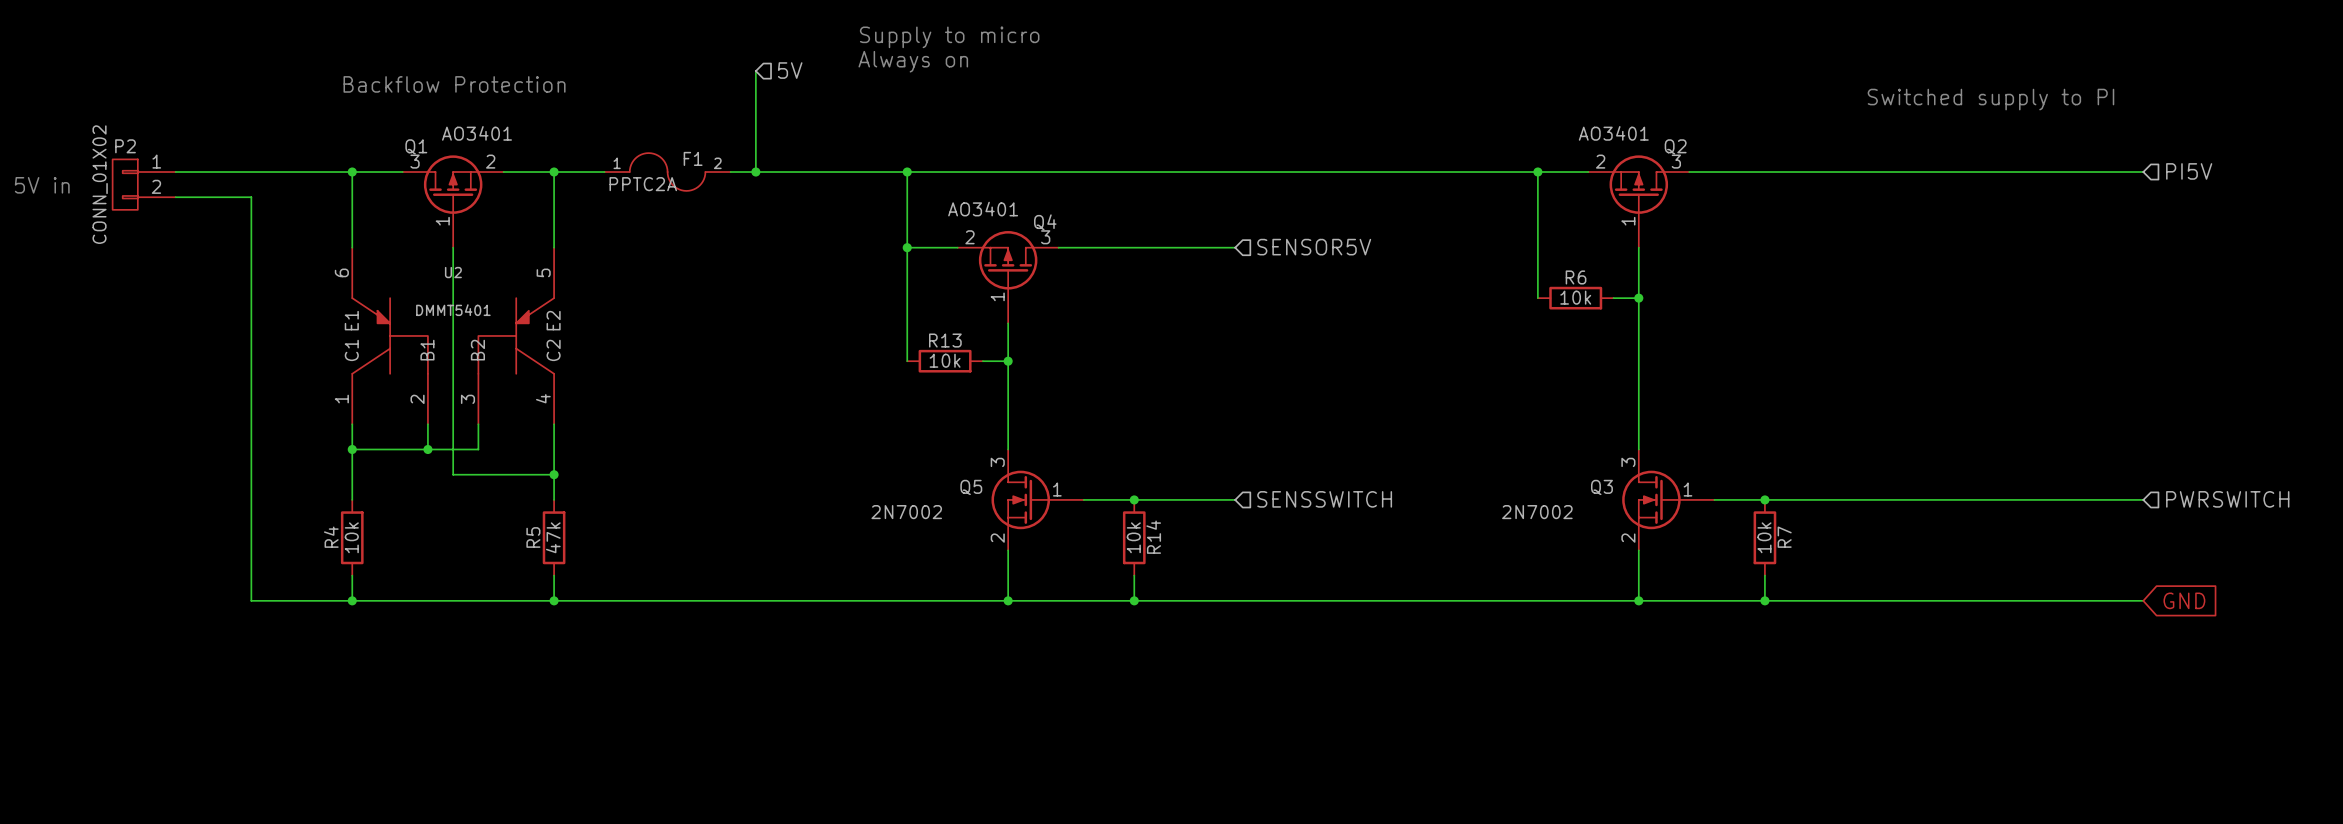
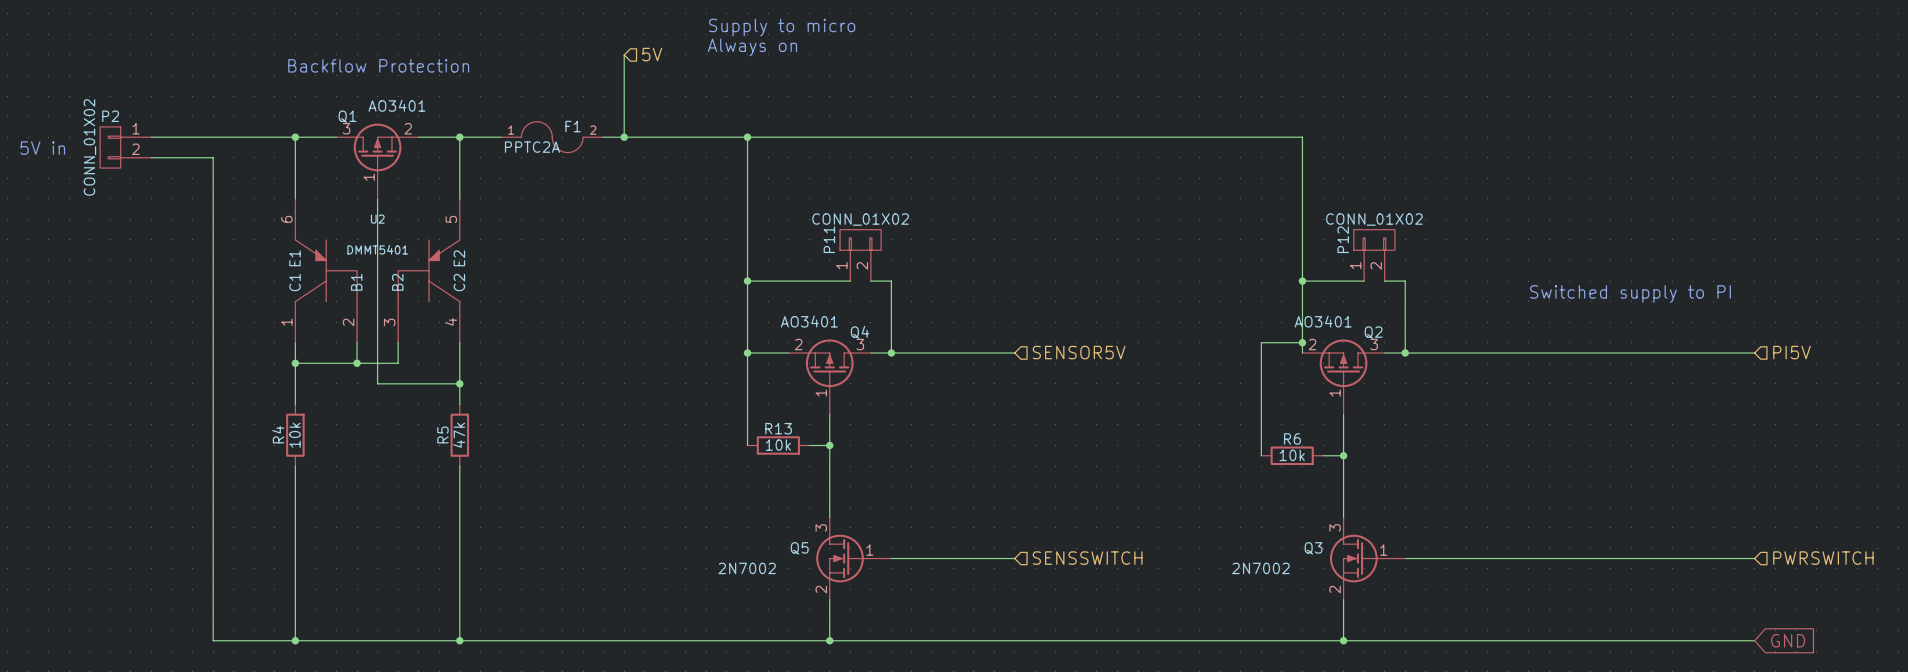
text: Switched supply to PI (1990, 99) -> none
hierarchical label: PI5V (2189, 171) -> none
wire: (1537, 172) (1537, 298) -> none
junction: (1537, 172) -> none
wire: none -> (1302, 137) (1302, 353)
wire: (1689, 172) (2143, 172) -> none
Q2 position: (1638, 201) -> (1343, 377)
wire: (907, 247) (957, 247) -> (747, 353) (788, 353)
junction: (907, 247) -> none
wire: (1058, 247) (1235, 247) -> (870, 353) (1014, 353)
hierarchical label position: SENSOR5V (1314, 247) -> SENSOR5V (1079, 352)
wire: (1638, 247) (1638, 449) -> none
Q4 position: (1008, 277) -> (829, 377)
R6 position: (1575, 298) -> (1292, 455)
wire: (1613, 298) (1638, 298) -> none
junction: (1638, 298) -> none
P11: none -> CONN_01X02 (860, 255)
P12: none -> CONN_01X02 (1374, 255)
wire: (1008, 323) (1008, 449) -> none
wire: none -> (747, 281) (850, 281)
junction: none -> (747, 281)
wire: none -> (870, 281) (891, 281) (891, 353)
wire: none -> (1302, 281) (1364, 281)
junction: none -> (1302, 281)
wire: none -> (1384, 281) (1405, 281) (1405, 353)
wire: none -> (747, 291) (747, 445)
R13 position: (945, 361) -> (778, 445)
wire: (982, 361) (1008, 361) -> none
junction: (1008, 361) -> none
text: none -> Switched supply to PI (1630, 293)
wire: none -> (1302, 342) (1261, 342) (1261, 455)
junction: none -> (1302, 342)
junction: none -> (747, 353)
junction: none -> (891, 353)
wire: none -> (1384, 353) (1754, 353)
junction: none -> (1405, 353)
hierarchical label: none -> PI5V (1791, 352)
Q5 position: (1037, 499) -> (853, 558)
wire: (1083, 499) (1235, 499) -> (891, 558) (1014, 558)
junction: (1134, 499) -> none
hierarchical label position: SENSSWITCH (1324, 499) -> SENSSWITCH (1087, 558)
Q3 position: (1668, 499) -> (1367, 558)
wire: (1714, 499) (2143, 499) -> (1405, 558) (1754, 558)
junction: (1764, 499) -> none
hierarchical label position: PWRSWITCH (2227, 499) -> PWRSWITCH (1823, 558)
wire: none -> (829, 414) (829, 445) (809, 445)
R14: 10k (1134, 537) -> none
R7: 10k (1764, 537) -> none
wire: none -> (1323, 455) (1343, 455)
wire: (1134, 575) (1134, 600) -> none
wire: (1764, 575) (1764, 600) -> none
wire: (251, 600) (2143, 600) -> (213, 486) (213, 640) (1754, 640)
wire: none -> (295, 486) (295, 640)
junction: (352, 600) -> none
wire: none -> (459, 486) (459, 640)
junction: (554, 600) -> none
wire: none -> (829, 486) (829, 517)
junction position: (1008, 600) -> (829, 445)
junction: (1134, 600) -> none
wire: none -> (1343, 486) (1343, 517)
junction position: (1638, 600) -> (1343, 455)
junction: (1764, 600) -> none
global label position: GND (2184, 600) -> GND (1788, 640)
wire: none -> (829, 599) (829, 640)
wire: none -> (1343, 599) (1343, 640)
junction: none -> (295, 640)
junction: none -> (459, 640)
junction: none -> (829, 640)
junction: none -> (1343, 640)

